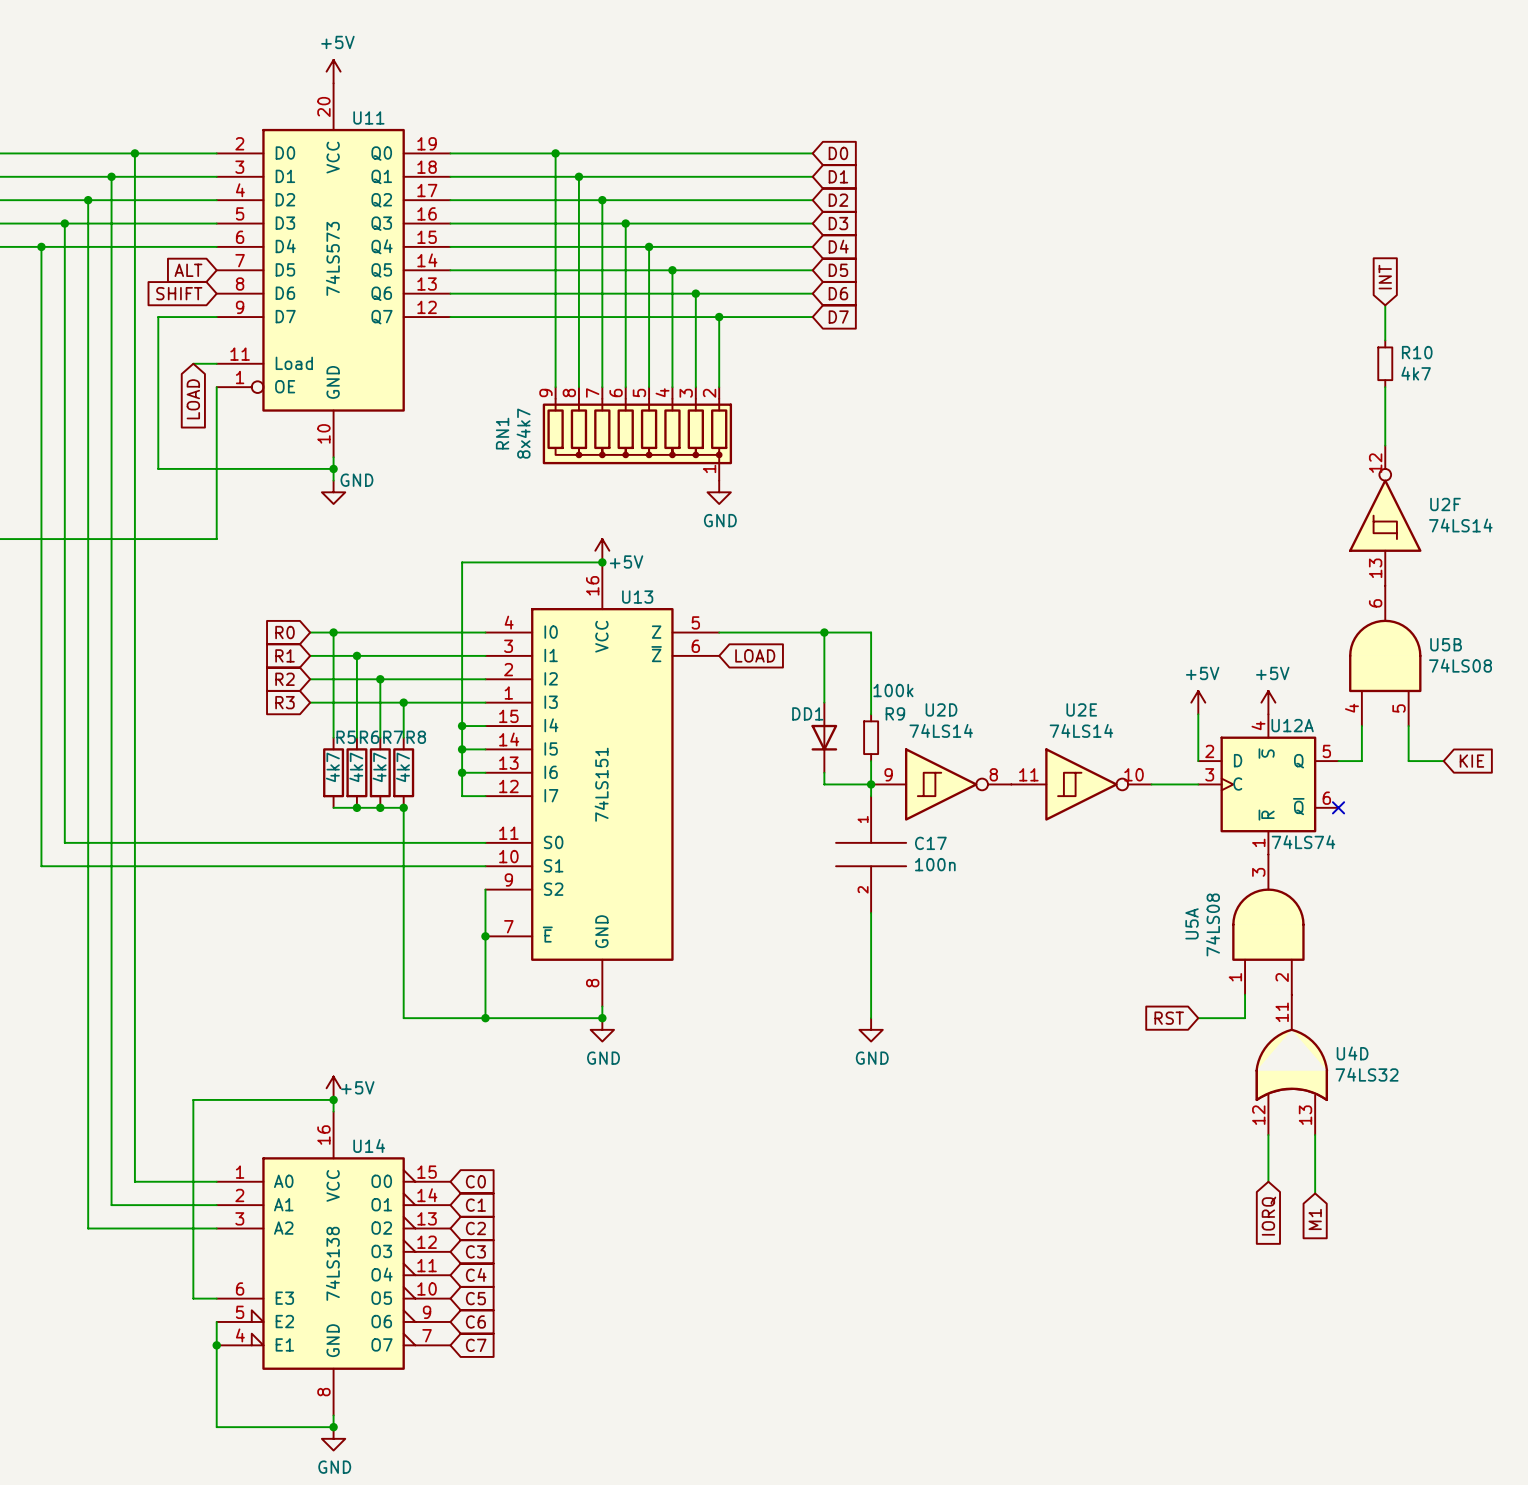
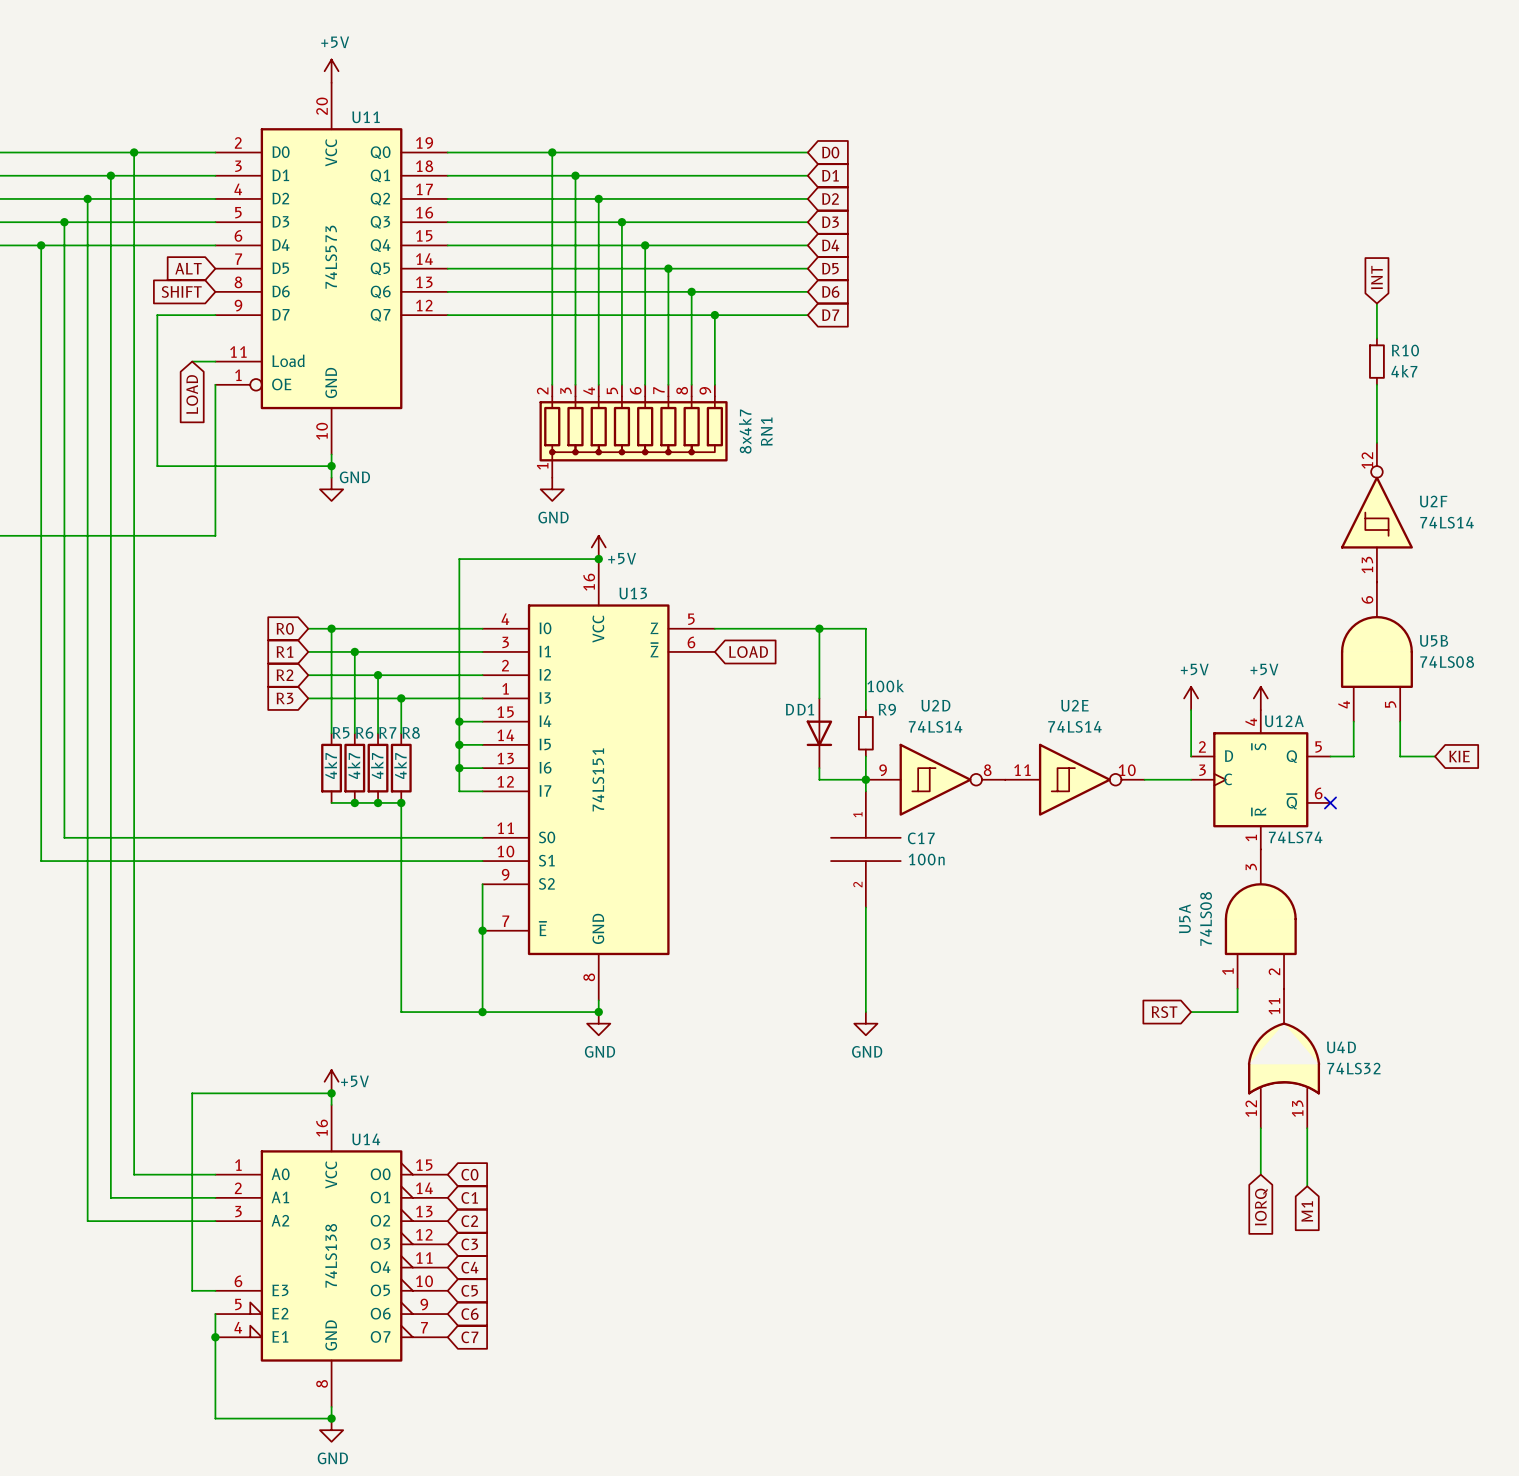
RN1 flip: as is (637, 431) -> left-right (633, 428)
power symbol position: GND (719, 492) -> GND (552, 489)

